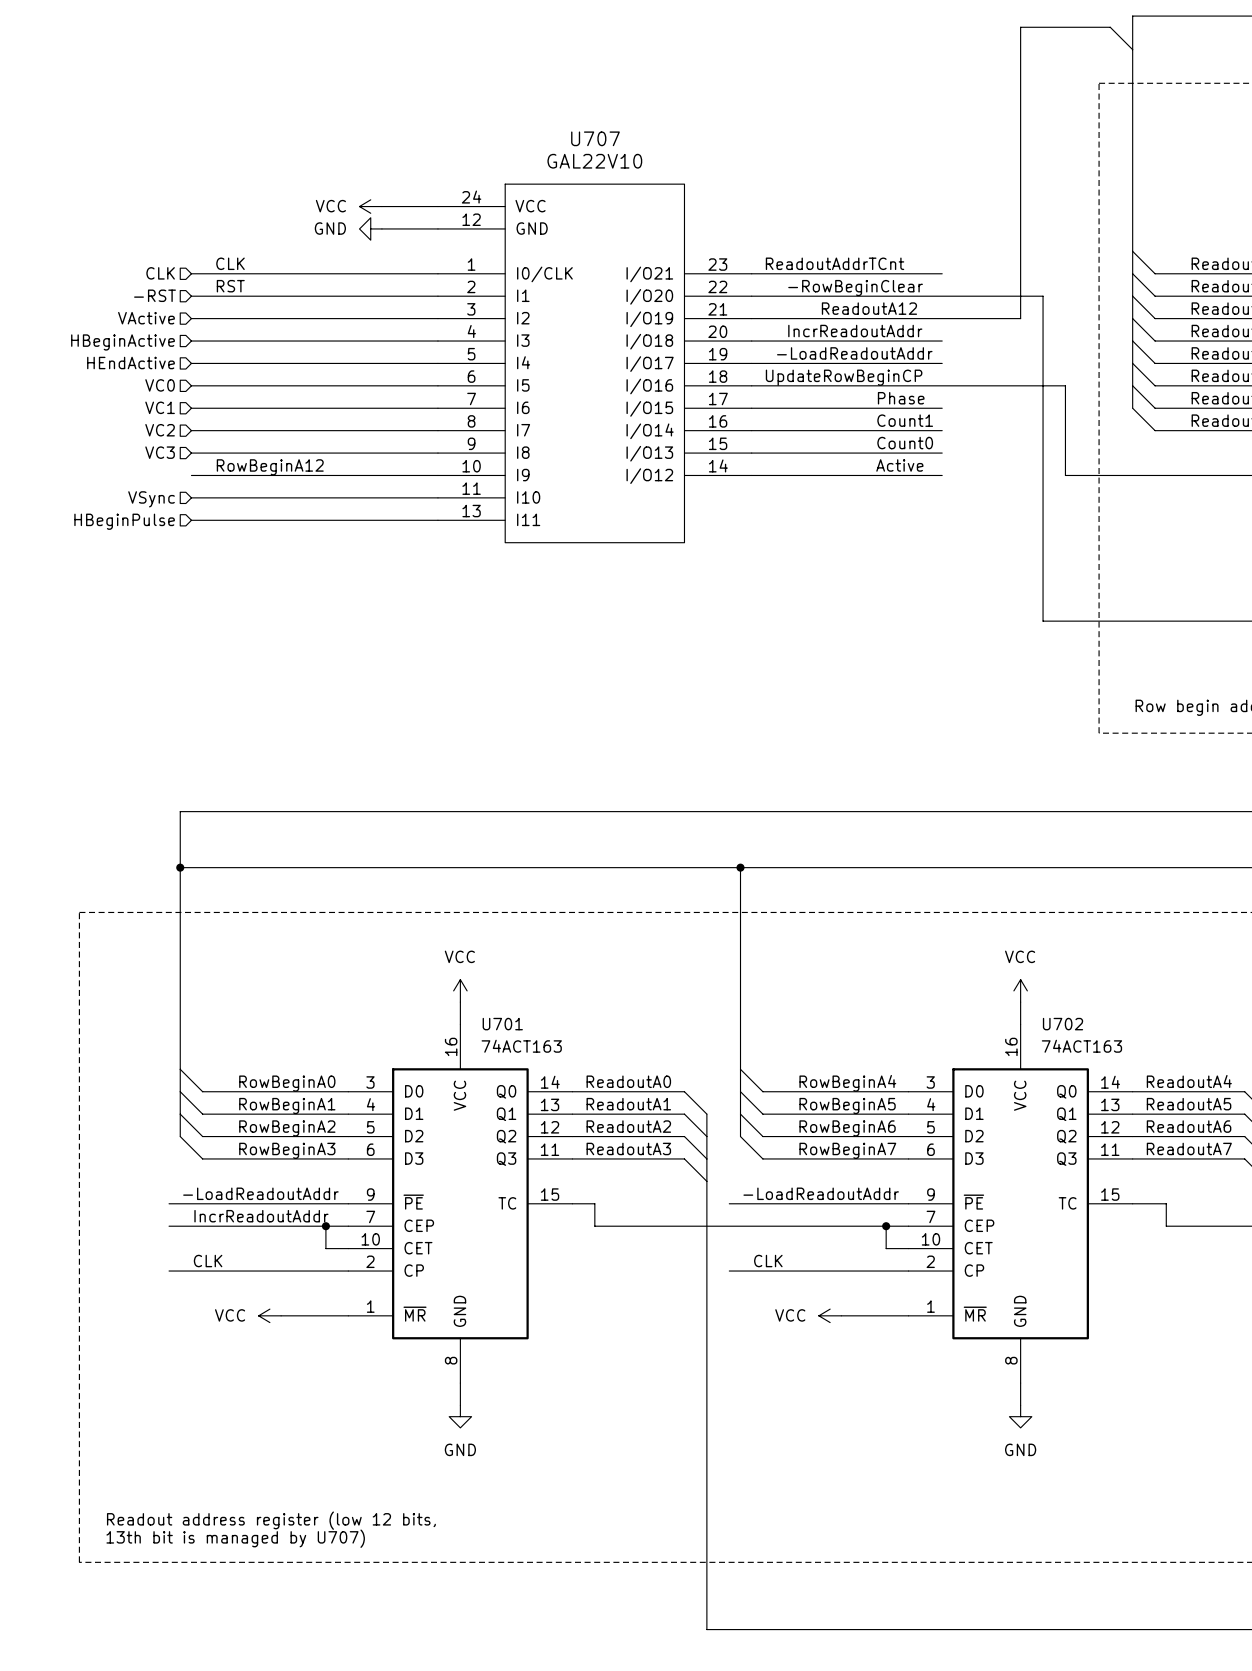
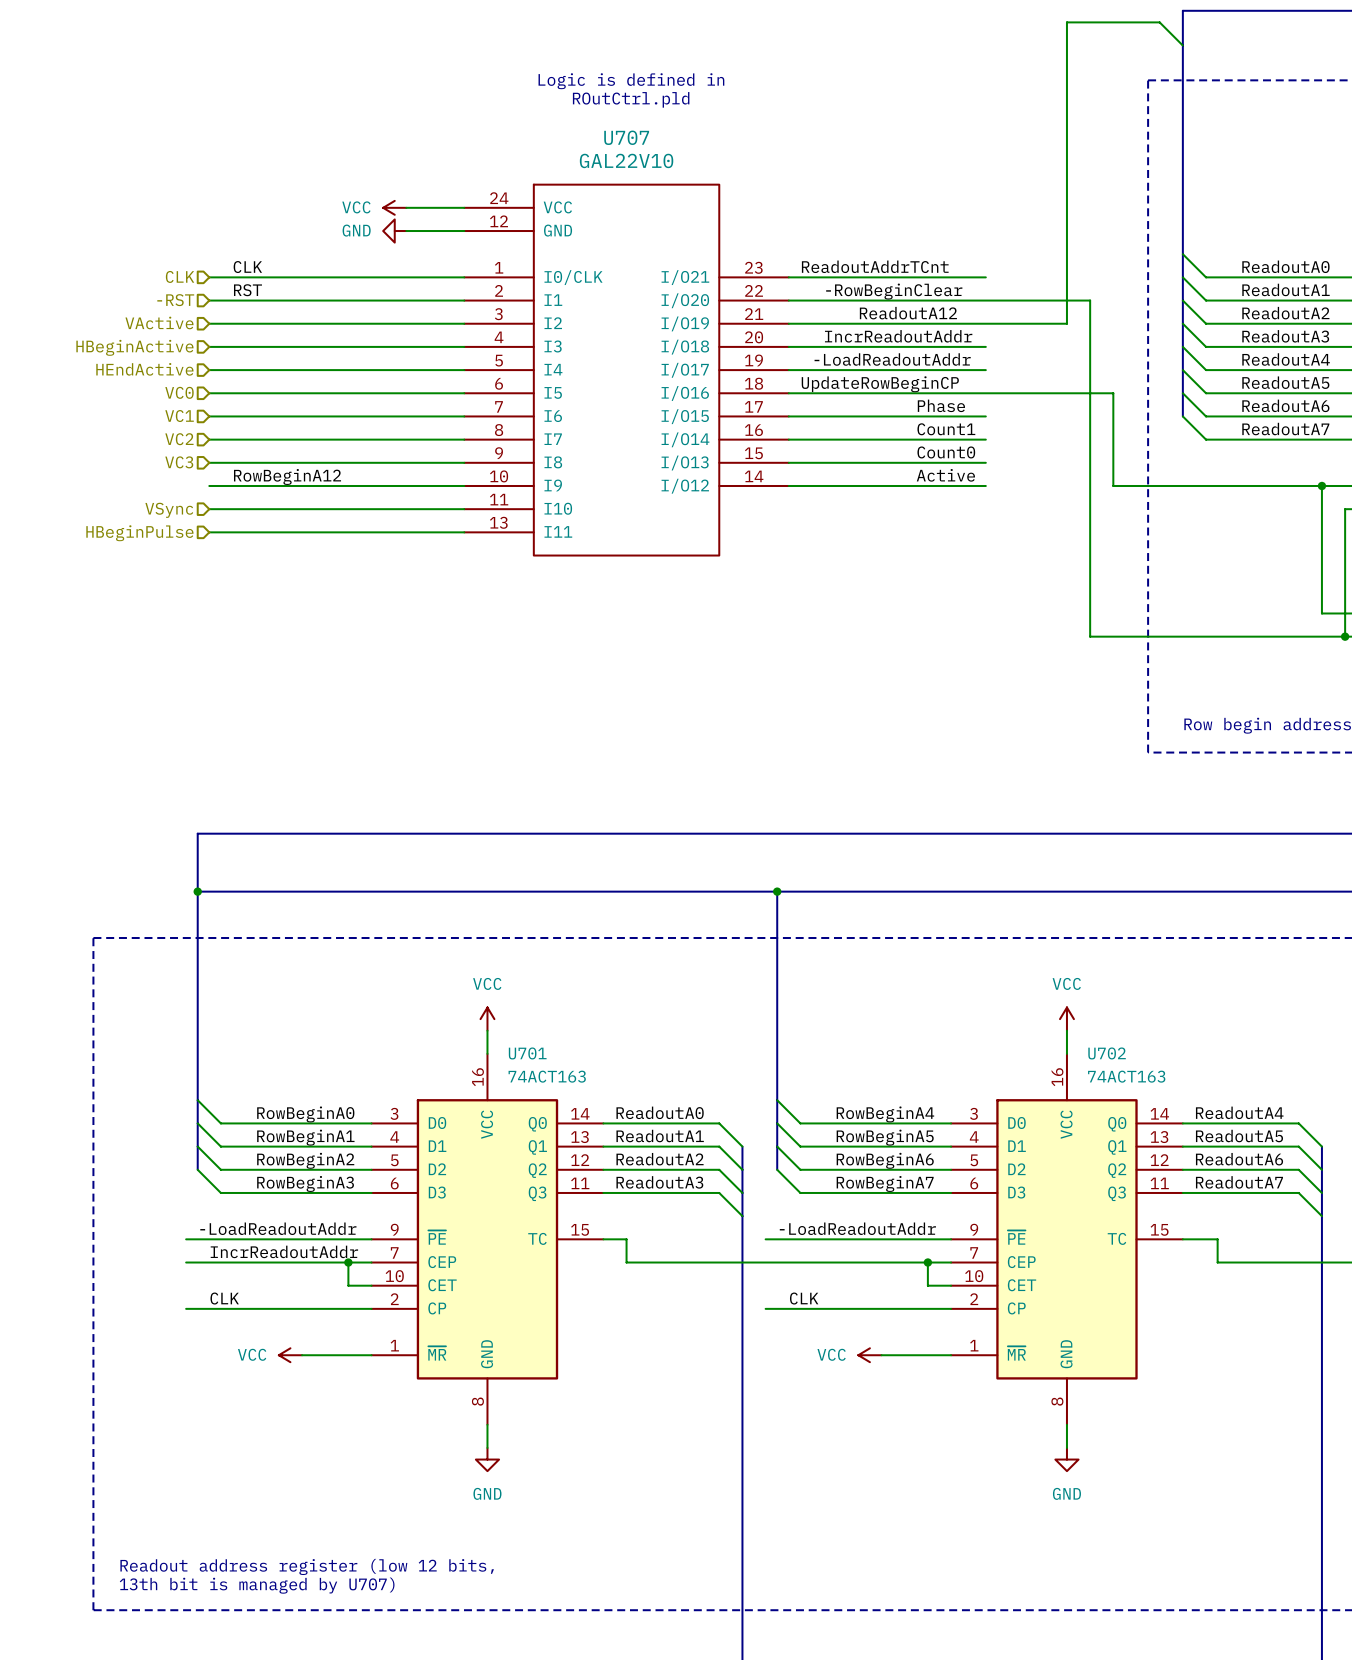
text: none -> Logic is defined in (631, 81)
text: none -> ROutCtrl.pld (631, 99)

